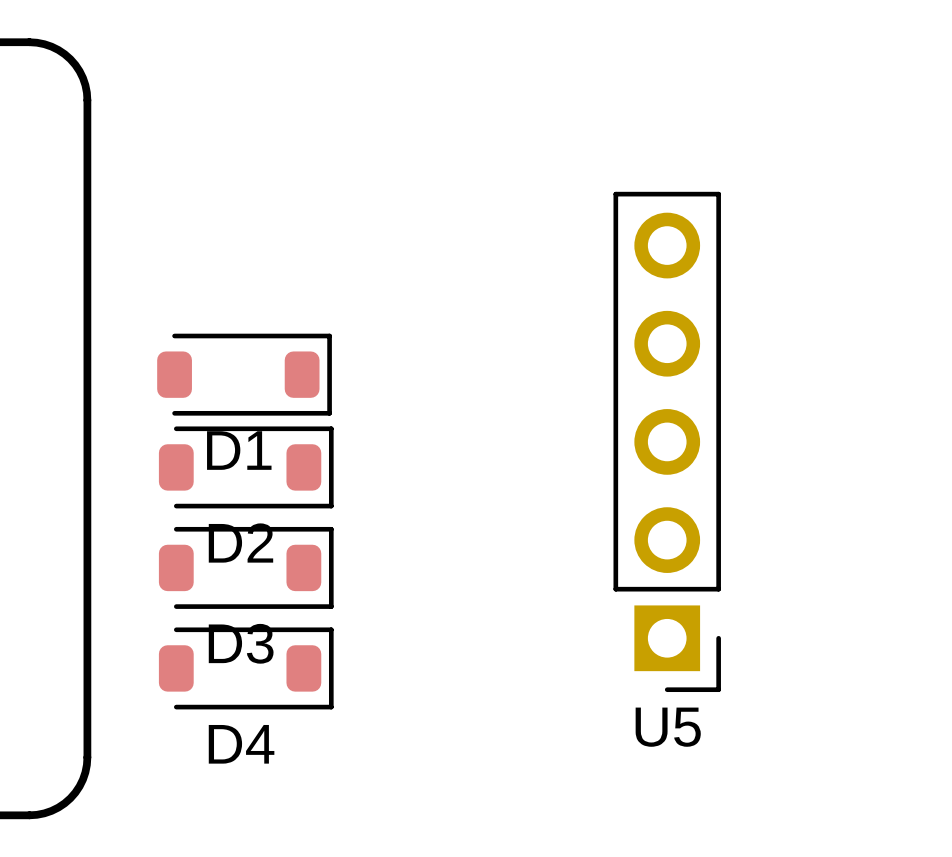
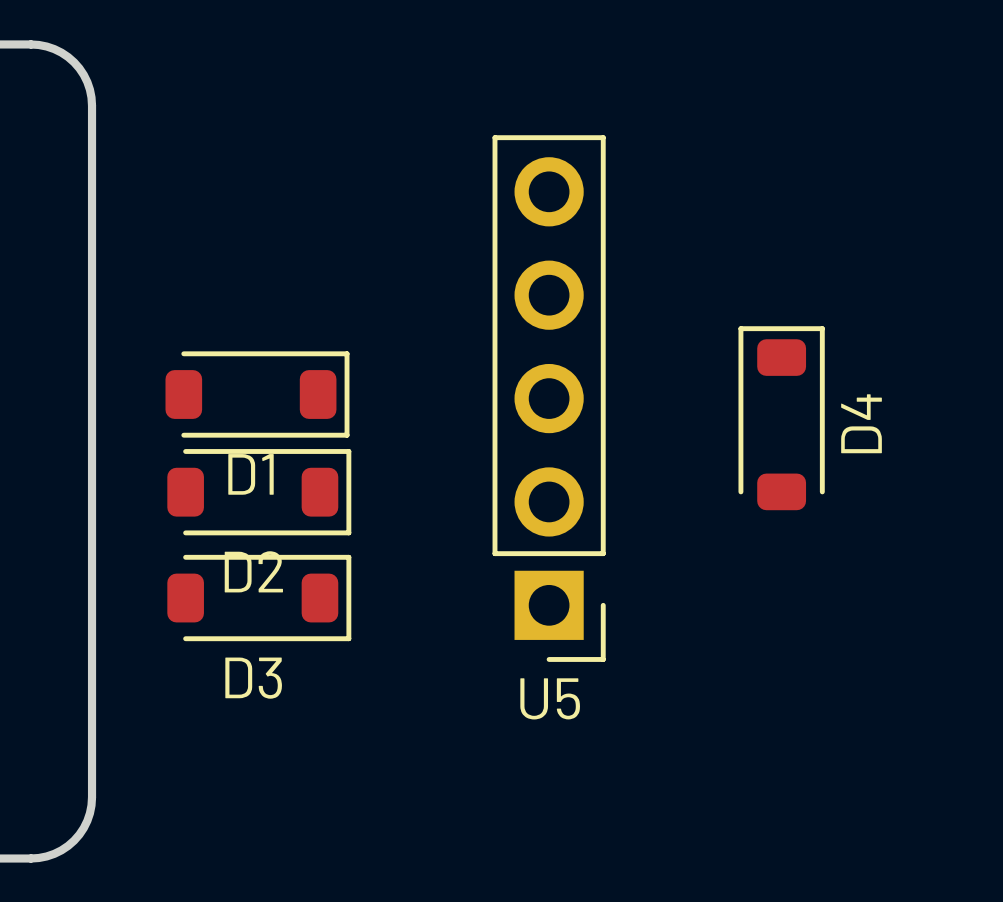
U5 position: (667, 441) -> (549, 398)
D4 rotation: 0° (246, 668) -> 90° counterclockwise (781, 418)
D4 position: (246, 668) -> (781, 418)

